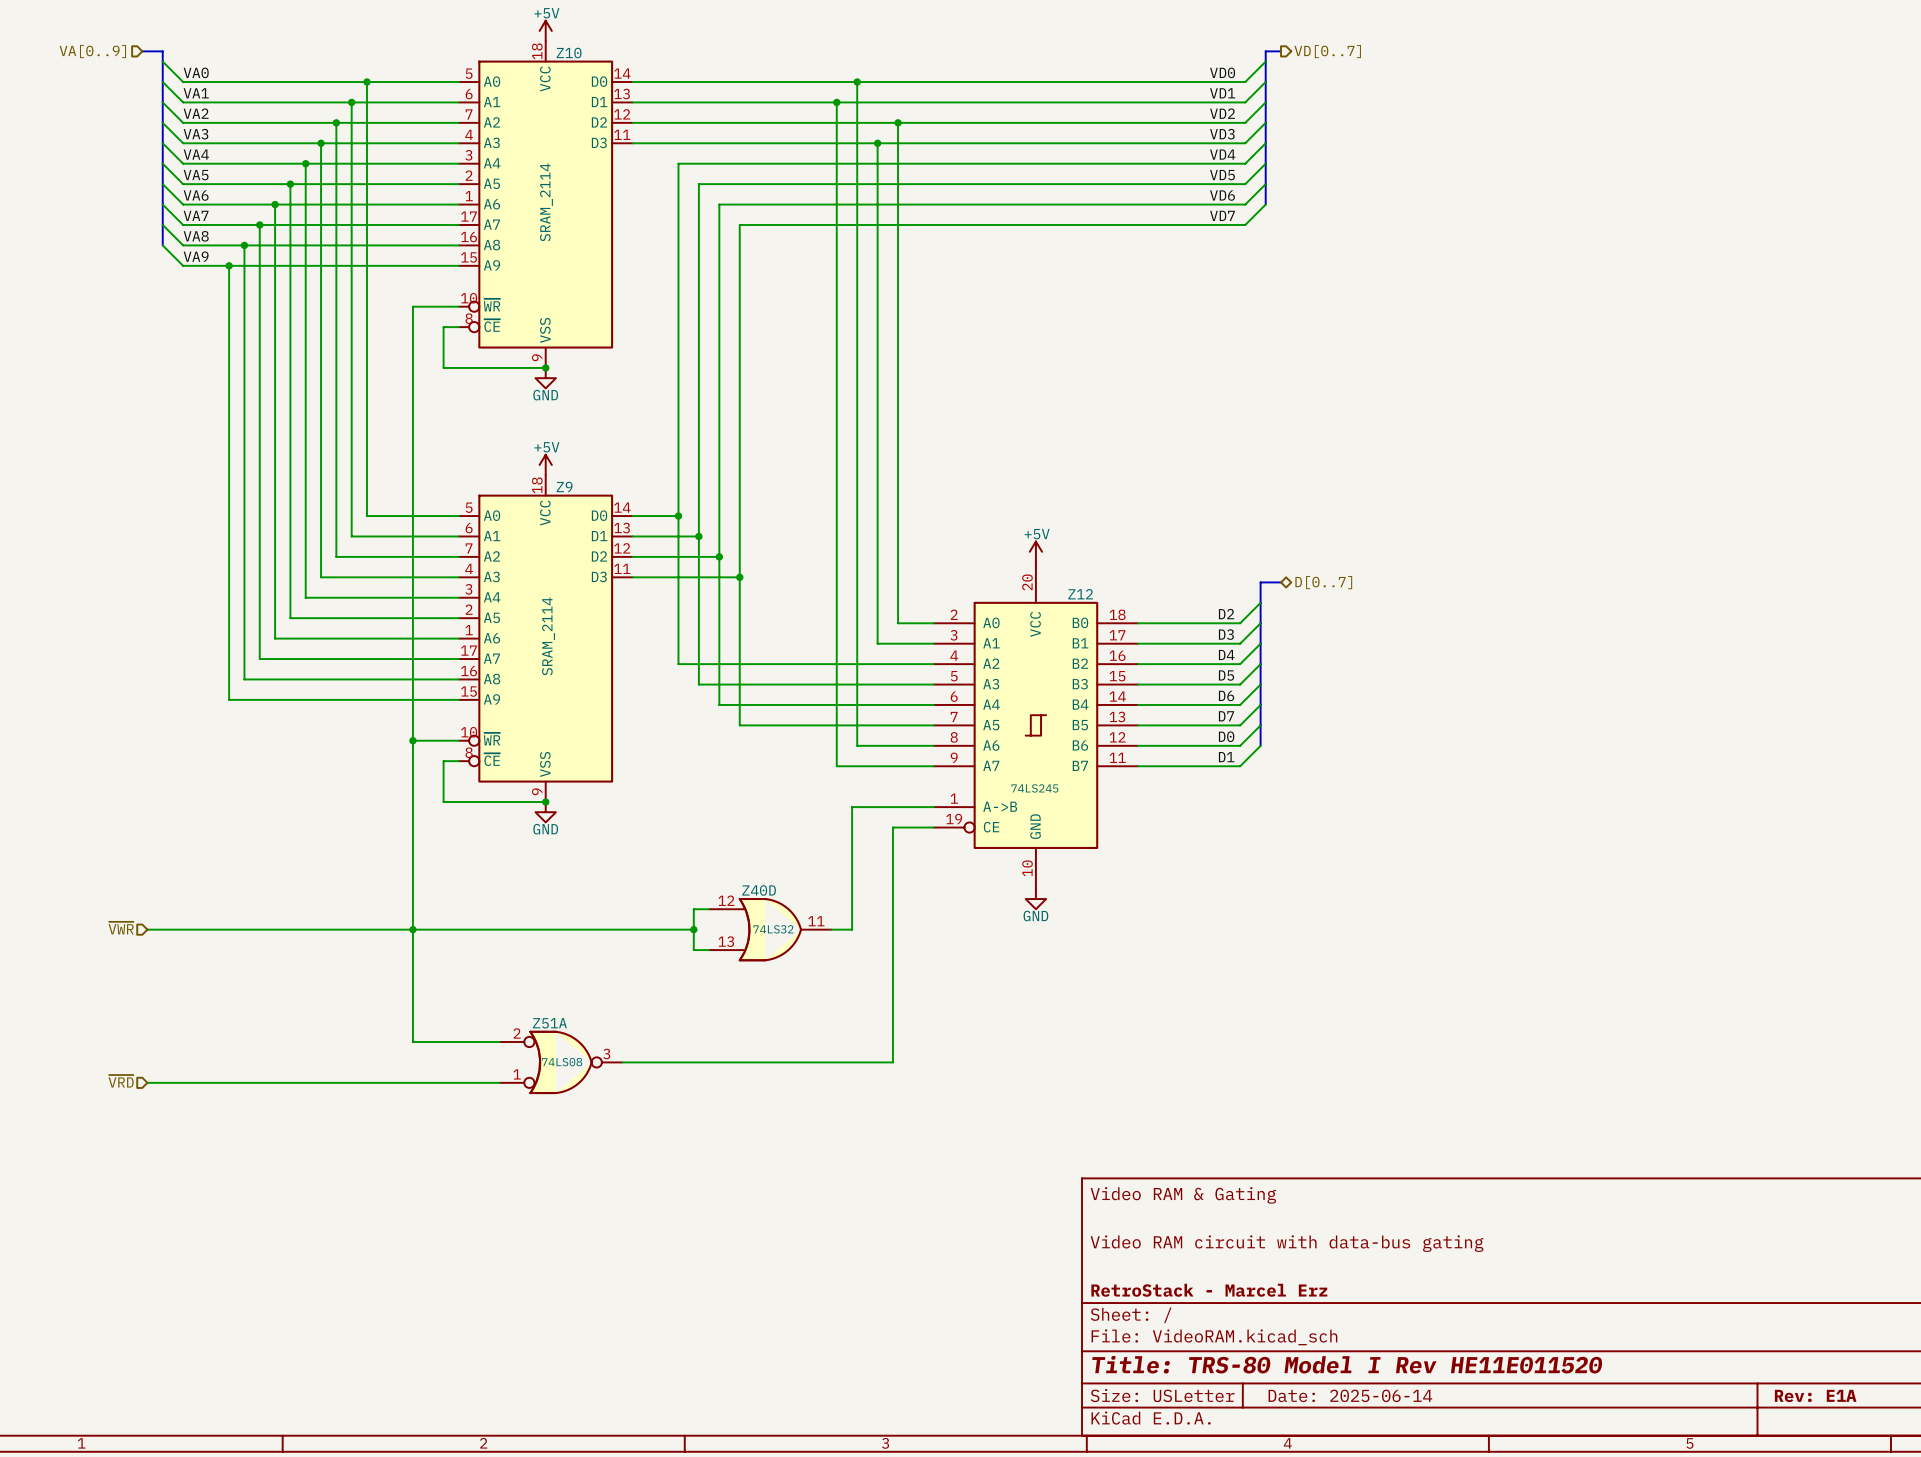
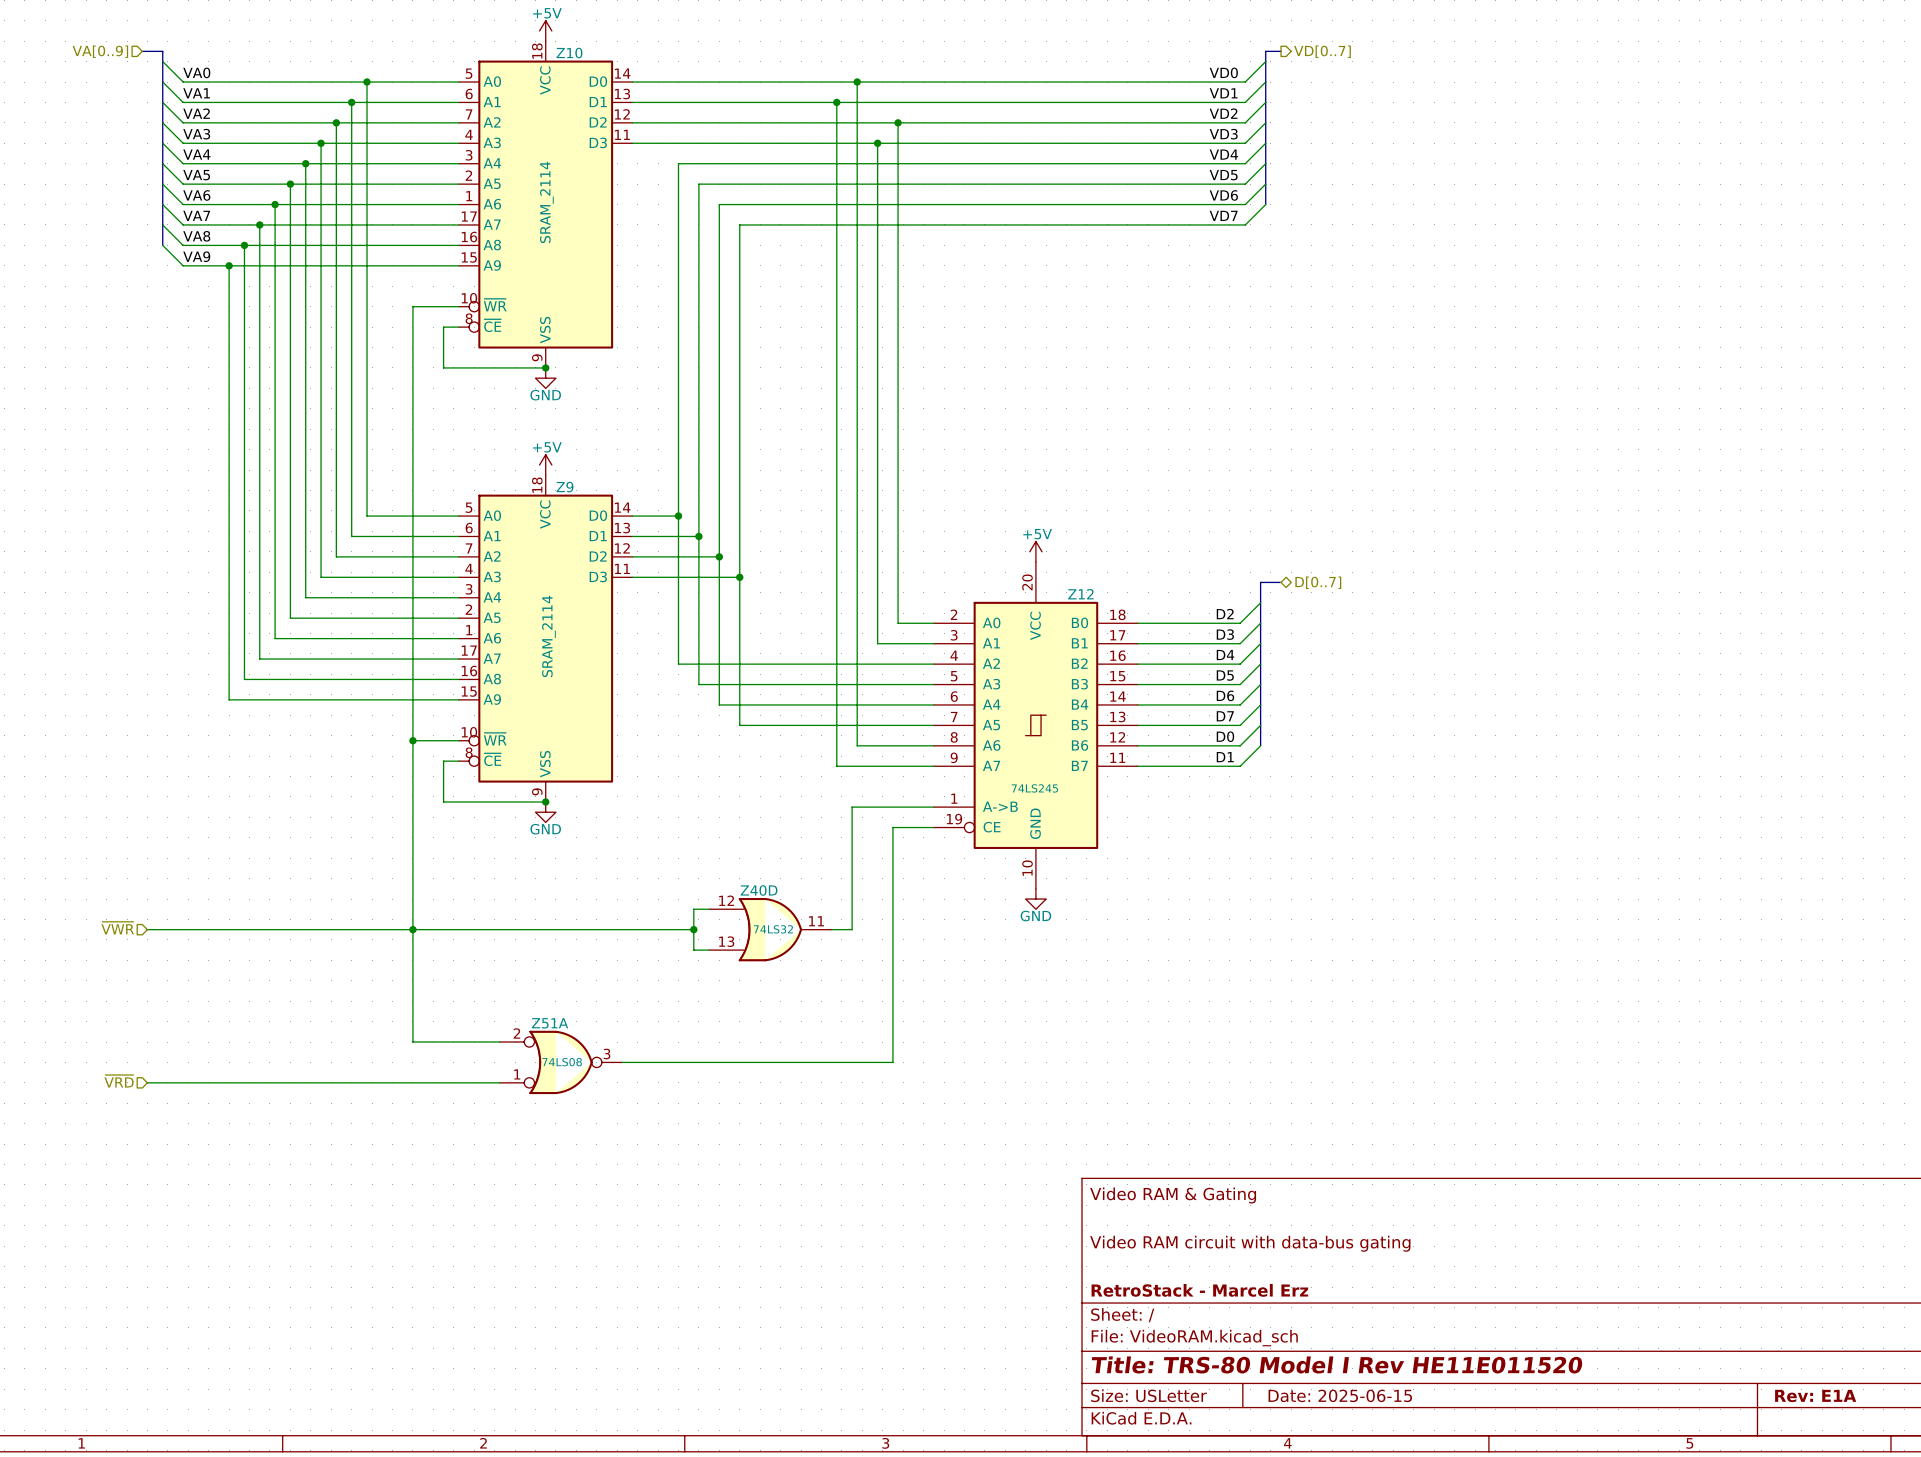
title block: Date: 2025-06-14 (1350, 1395) -> Date: 2025-06-15 (1340, 1395)

